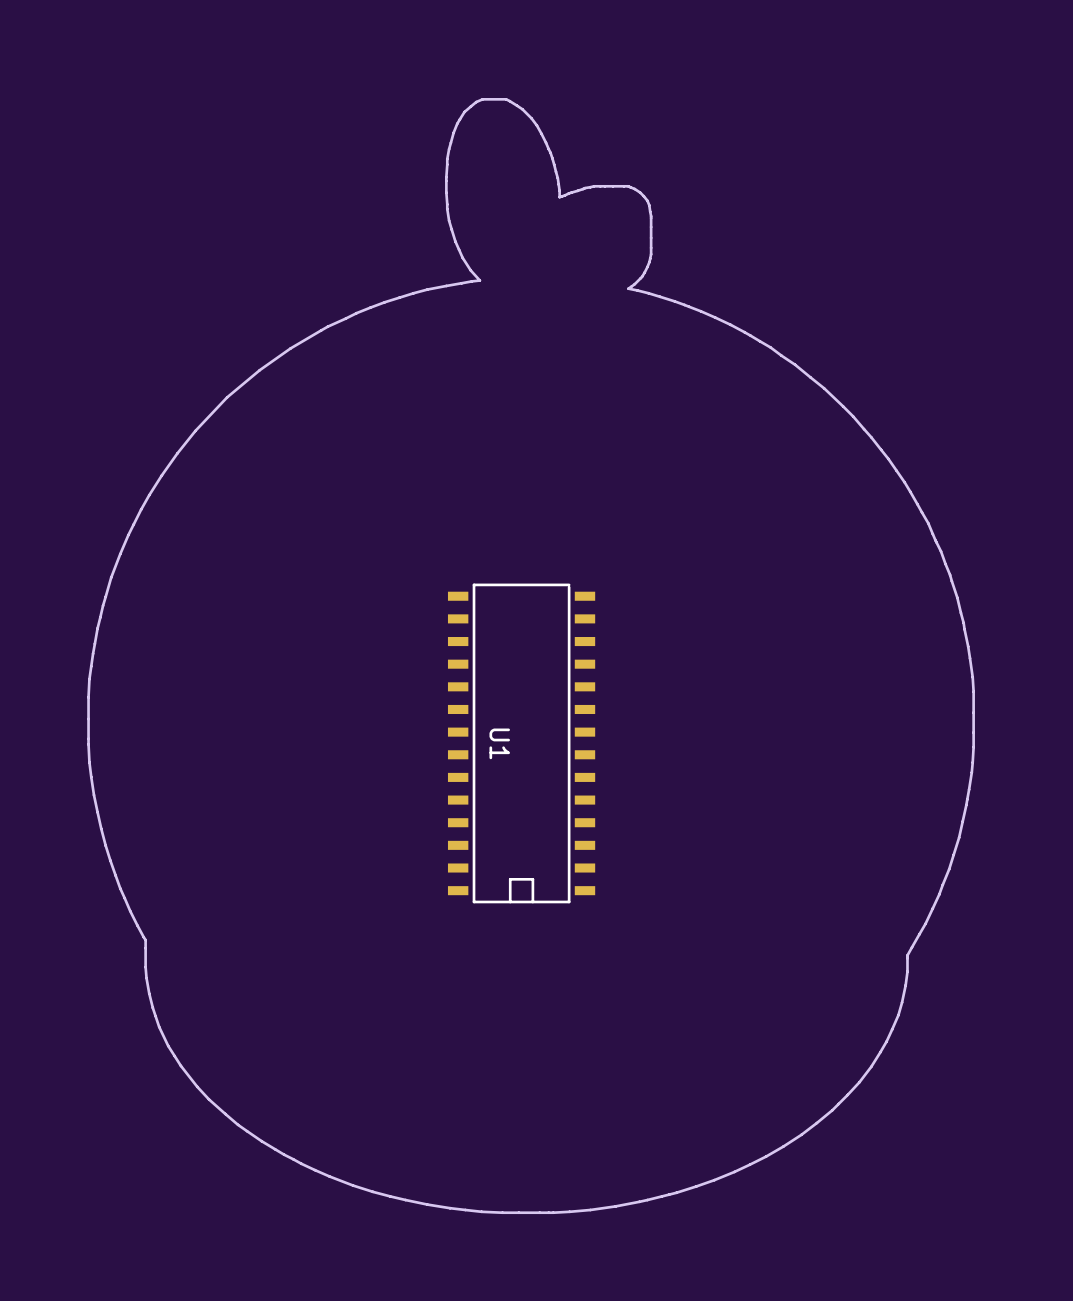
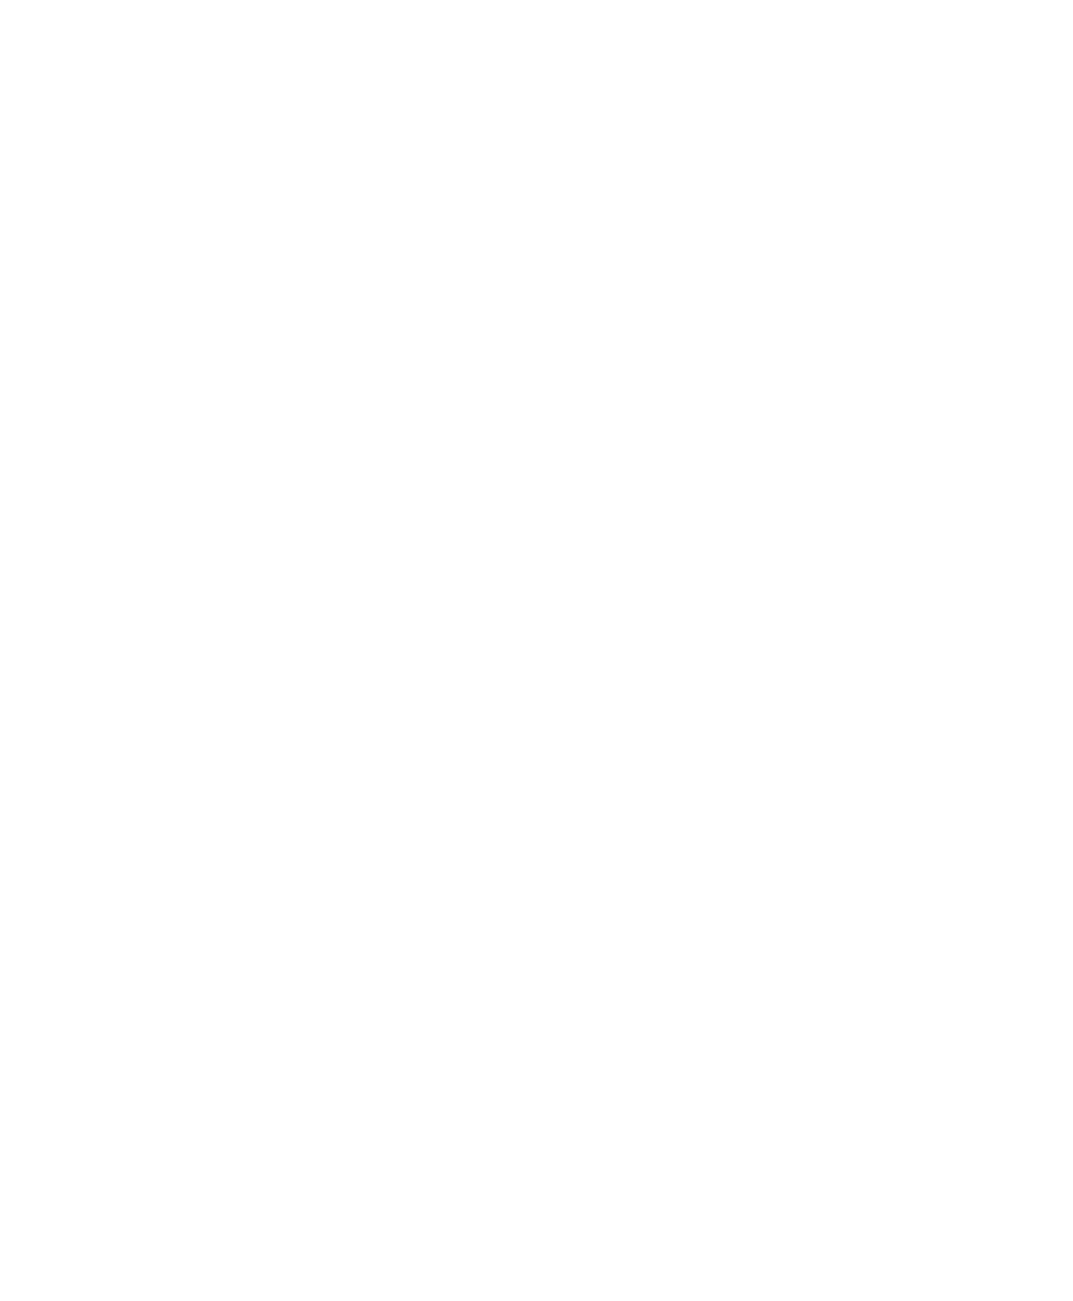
board edge: (506, 99) (482, 99) (464, 112) (453, 132) (447, 159) (446, 192) (449, 220) (462, 257) (479, 280) (427, 289) (384, 302) (327, 326) (290, 348) (259, 370) (227, 397) (195, 430) (161, 475) (128, 535) (111, 577) (103, 605) (89, 679) (88, 744) (93, 795) (101, 828) (120, 888) (145, 940) (146, 978) (159, 1027) (180, 1065) (209, 1099) (238, 1124) (284, 1154) (353, 1185) (405, 1200) (450, 1208) (481, 1211) (553, 1212) (590, 1209) (647, 1200) (696, 1186) (734, 1171) (766, 1156) (801, 1134) (832, 1110) (859, 1082) (886, 1041) (898, 1015) (905, 985) (907, 955) (939, 894) (959, 837) (971, 772) (973, 691) (963, 622) (950, 574) (928, 523) (888, 458) (853, 416) (824, 388) (770, 347) (730, 324) (700, 311) (674, 301) (628, 288) (642, 276) (650, 258) (651, 216) (647, 200) (640, 192) (628, 186) (594, 186) (559, 197) (557, 178) (552, 158) (541, 133) (531, 118) (522, 109) (506, 99) -> none
U1: (521, 743) -> none

